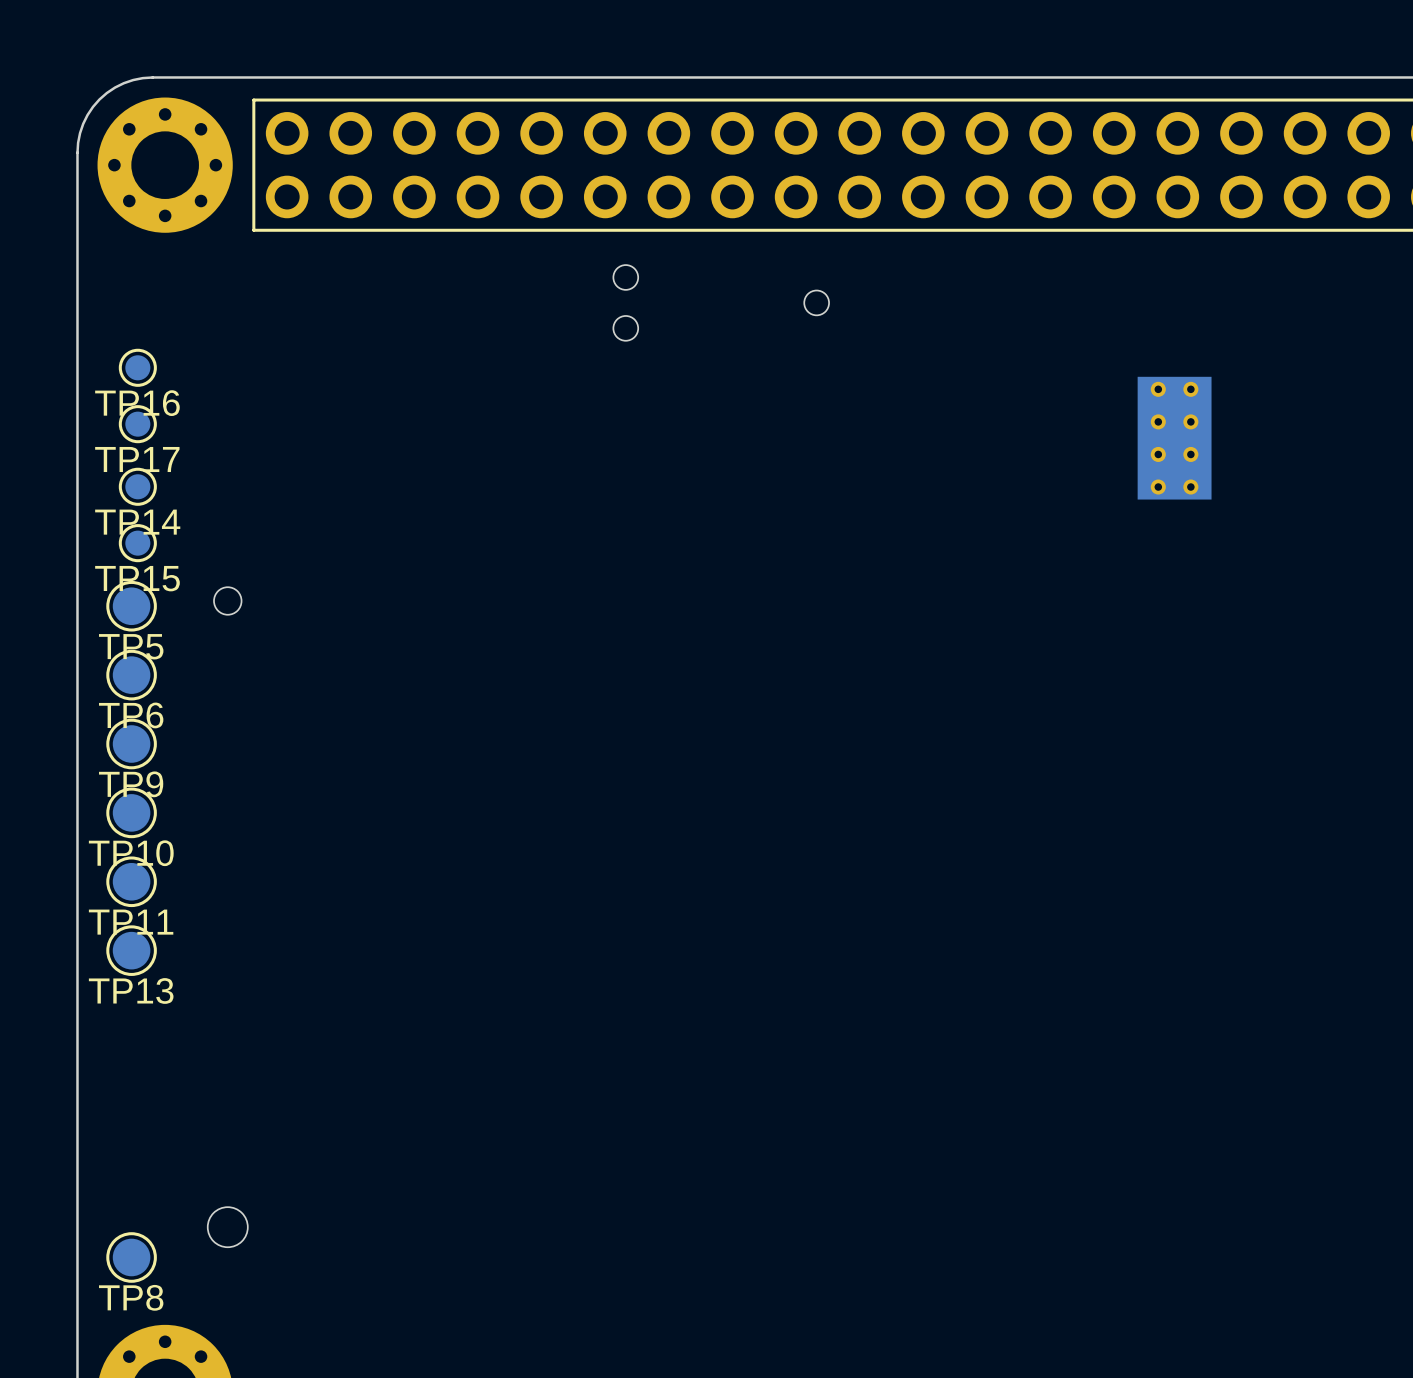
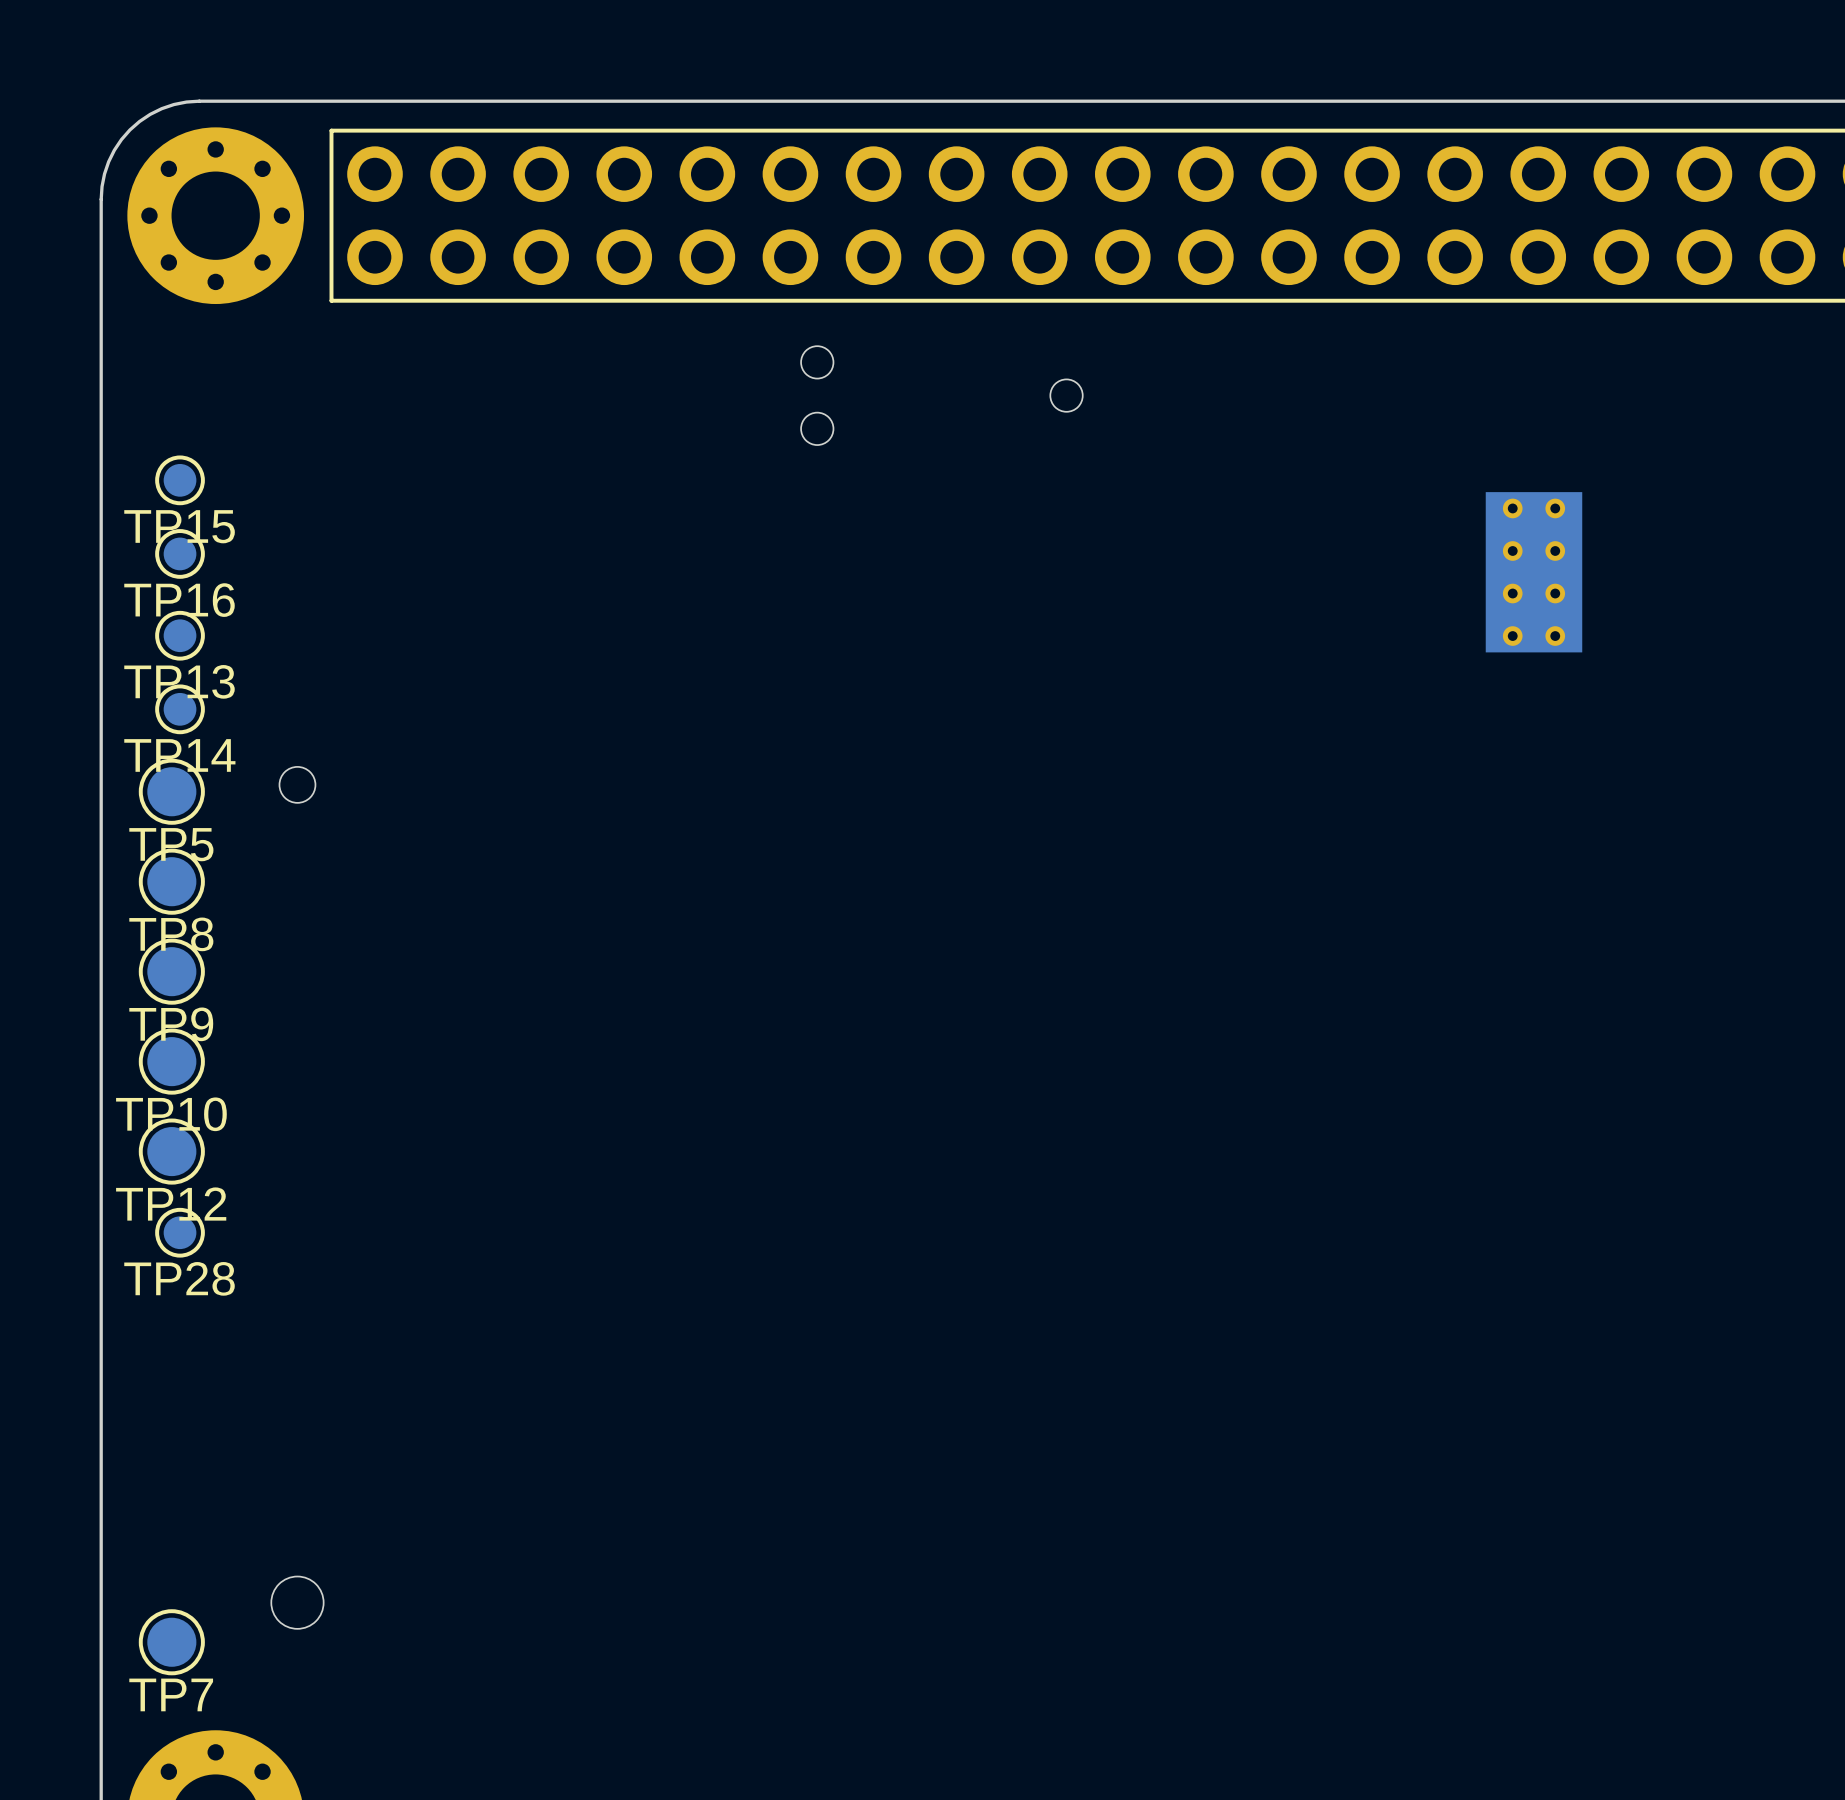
TP16 name: TP16 (137, 403) -> TP15 (179, 526)
TP17 name: TP17 (137, 459) -> TP16 (179, 600)
TP14 name: TP14 (137, 522) -> TP13 (179, 681)
TP15 name: TP15 (137, 578) -> TP14 (179, 755)
TP6 name: TP6 (131, 715) -> TP8 (171, 934)
TP11 name: TP11 (131, 922) -> TP12 (171, 1204)
TP28: none -> (180, 1232)
TP13: (131, 950) -> none
TP8 name: TP8 (131, 1297) -> TP7 (171, 1694)

